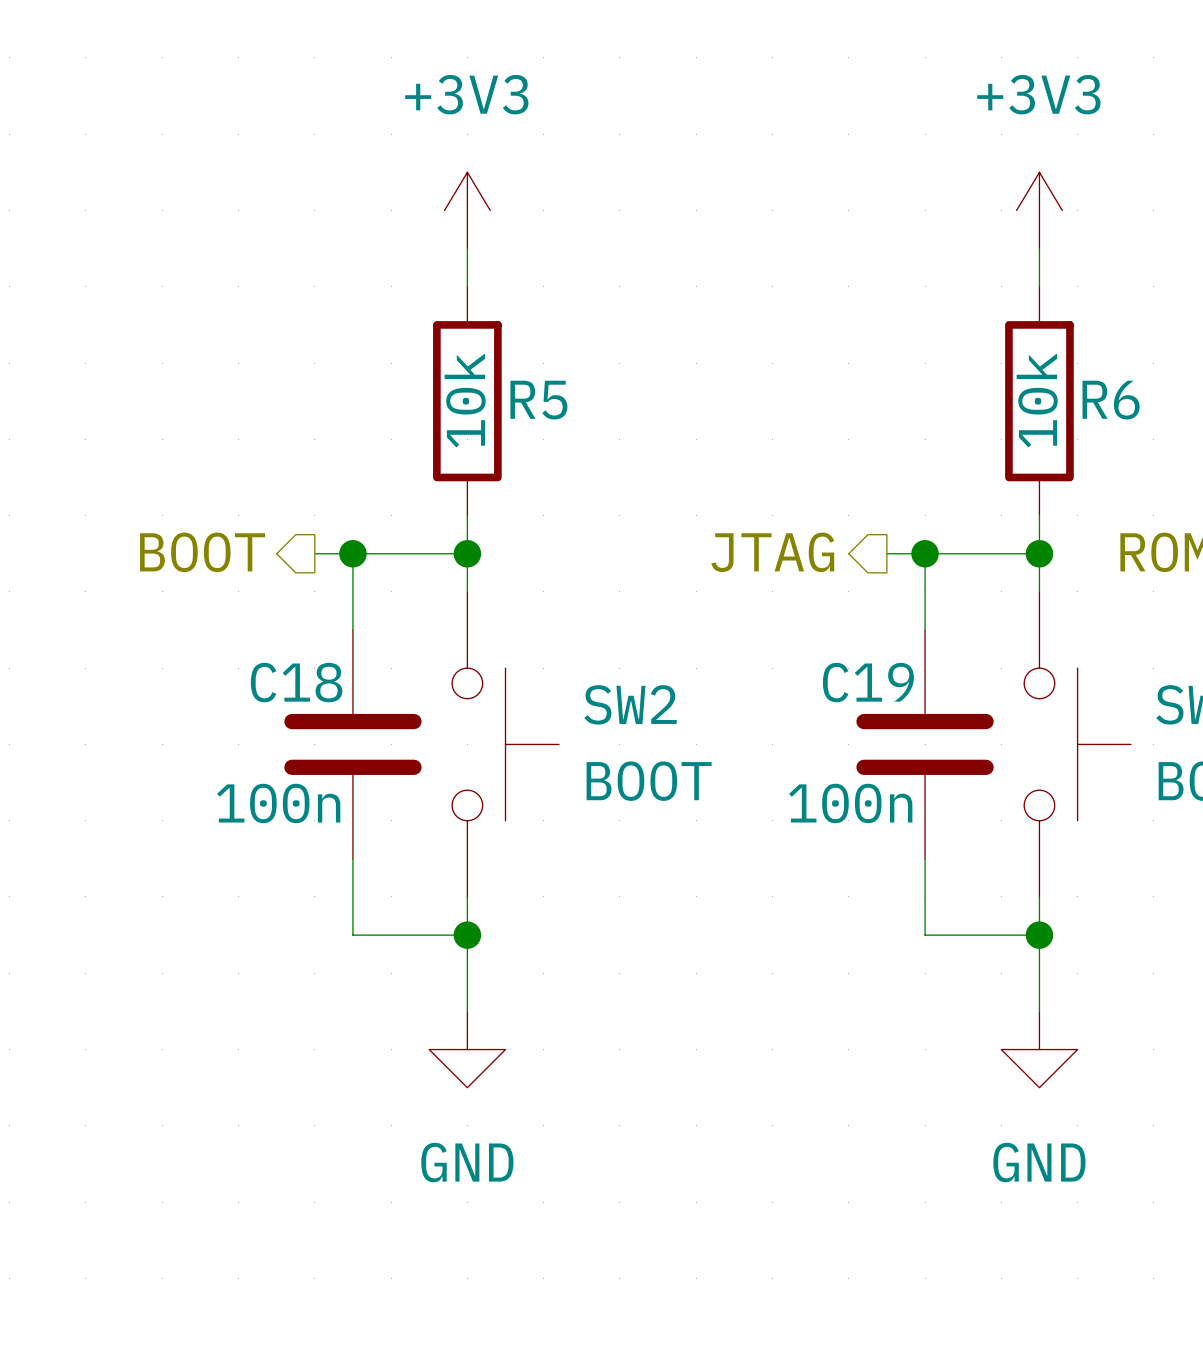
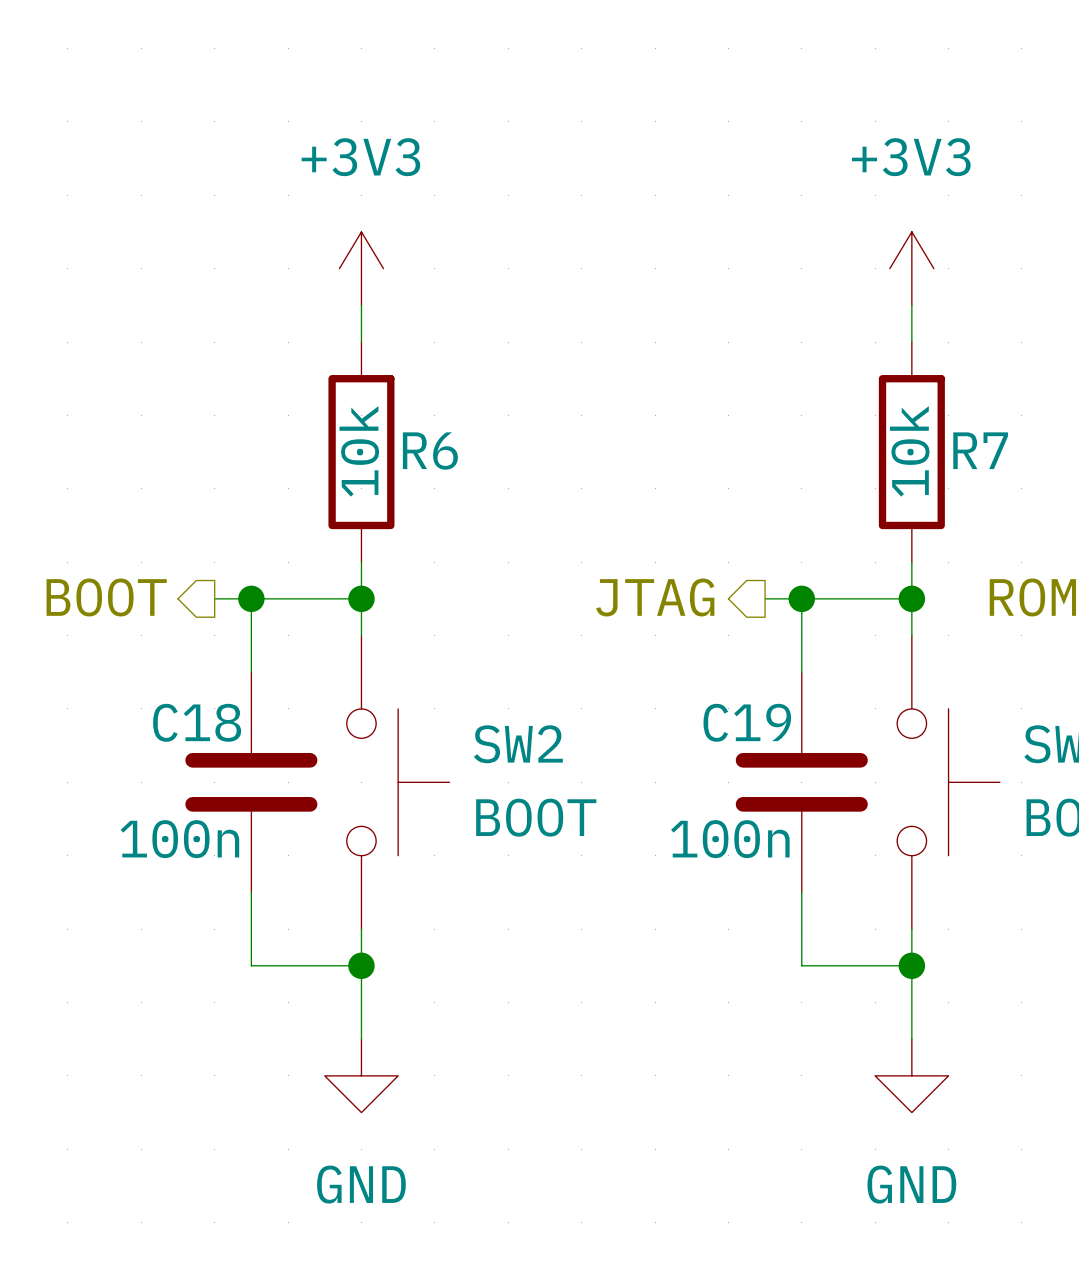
R5 name: R5 (538, 400) -> R6 (430, 451)
R6 name: R6 (1111, 400) -> R7 (980, 450)

